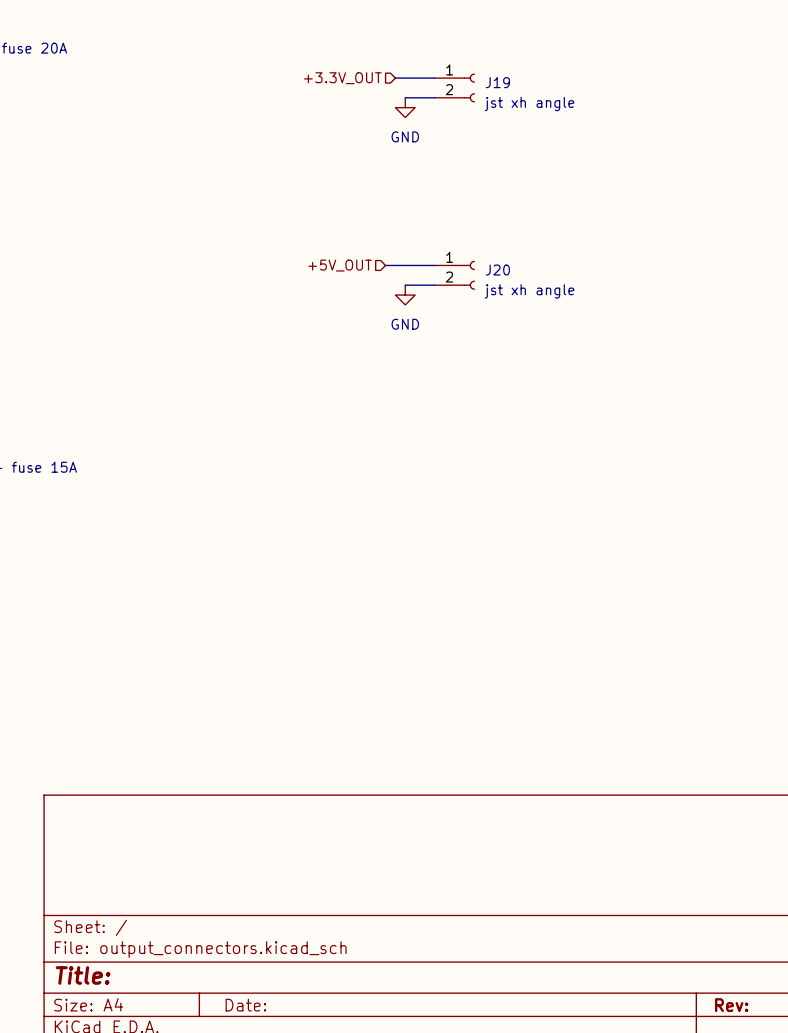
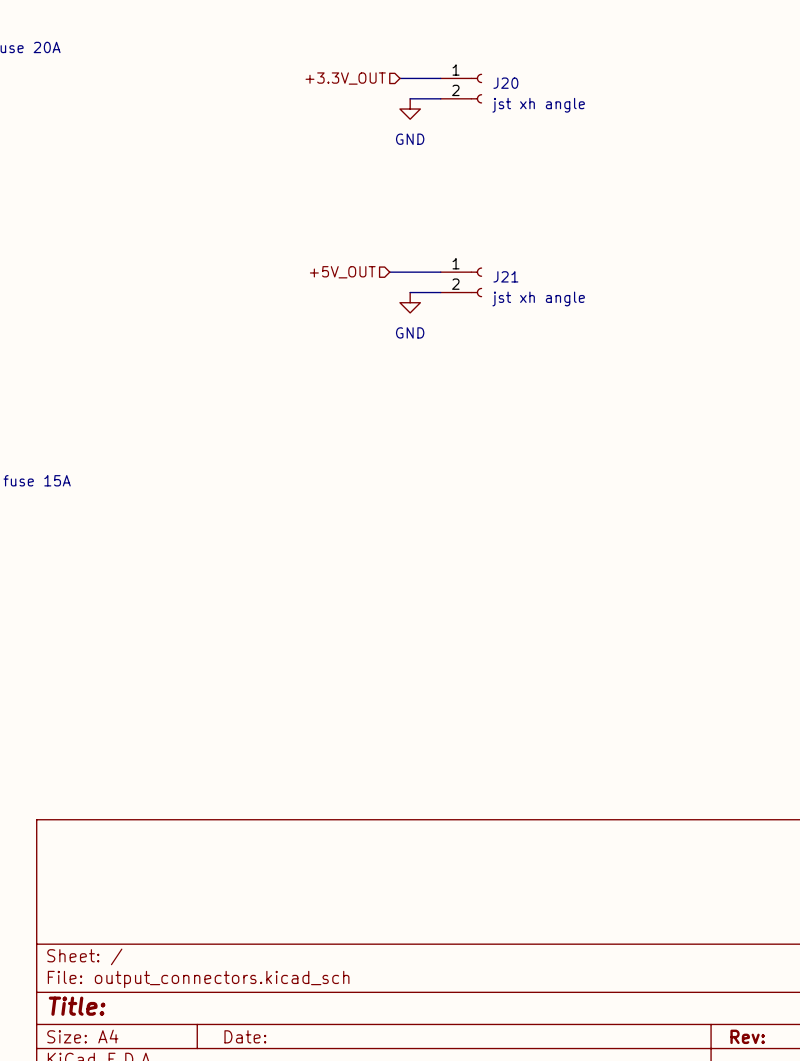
J19 name: J19 (497, 82) -> J20 (505, 83)
J20 name: J20 (497, 270) -> J21 (505, 276)

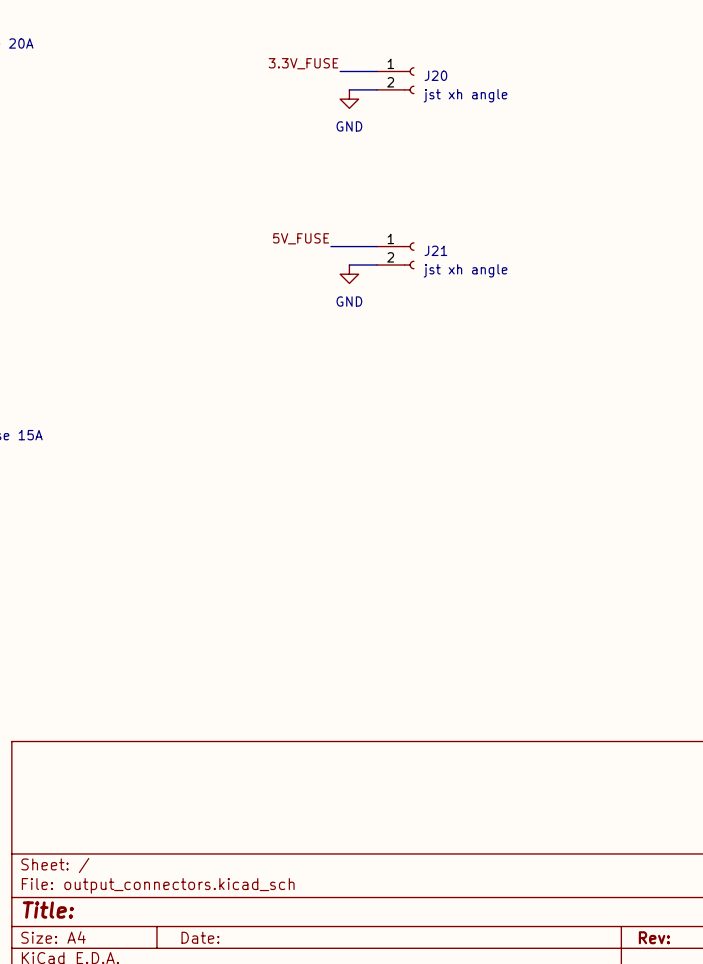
label: none -> 3.3V_FUSE (303, 63)
hierarchical label: +3.3V_OUT (345, 78) -> none
label: none -> 5V_FUSE (301, 238)
hierarchical label: +5V_OUT (342, 272) -> none

